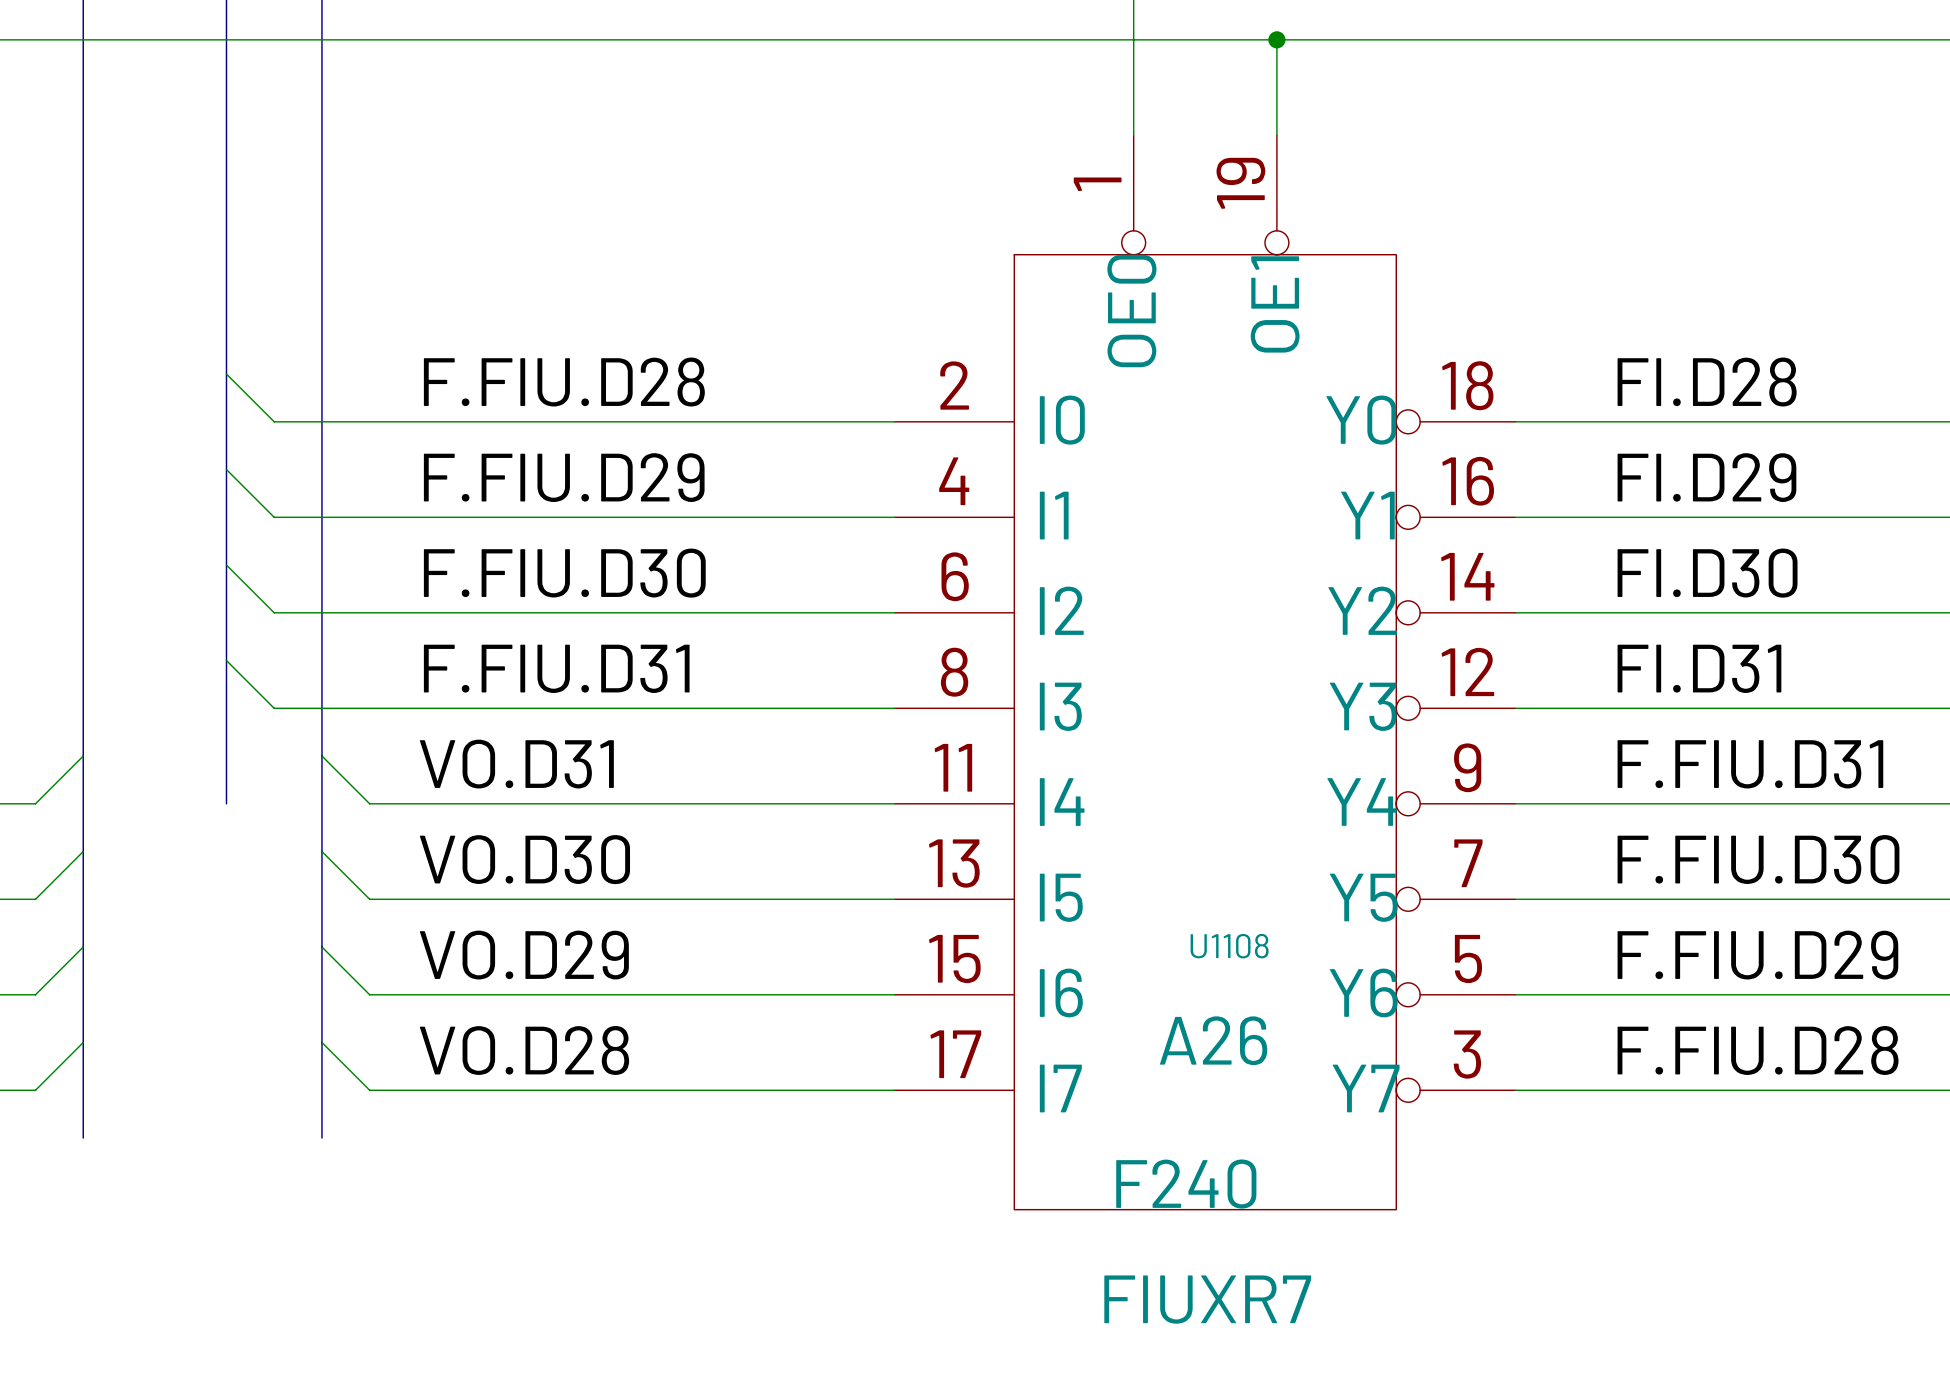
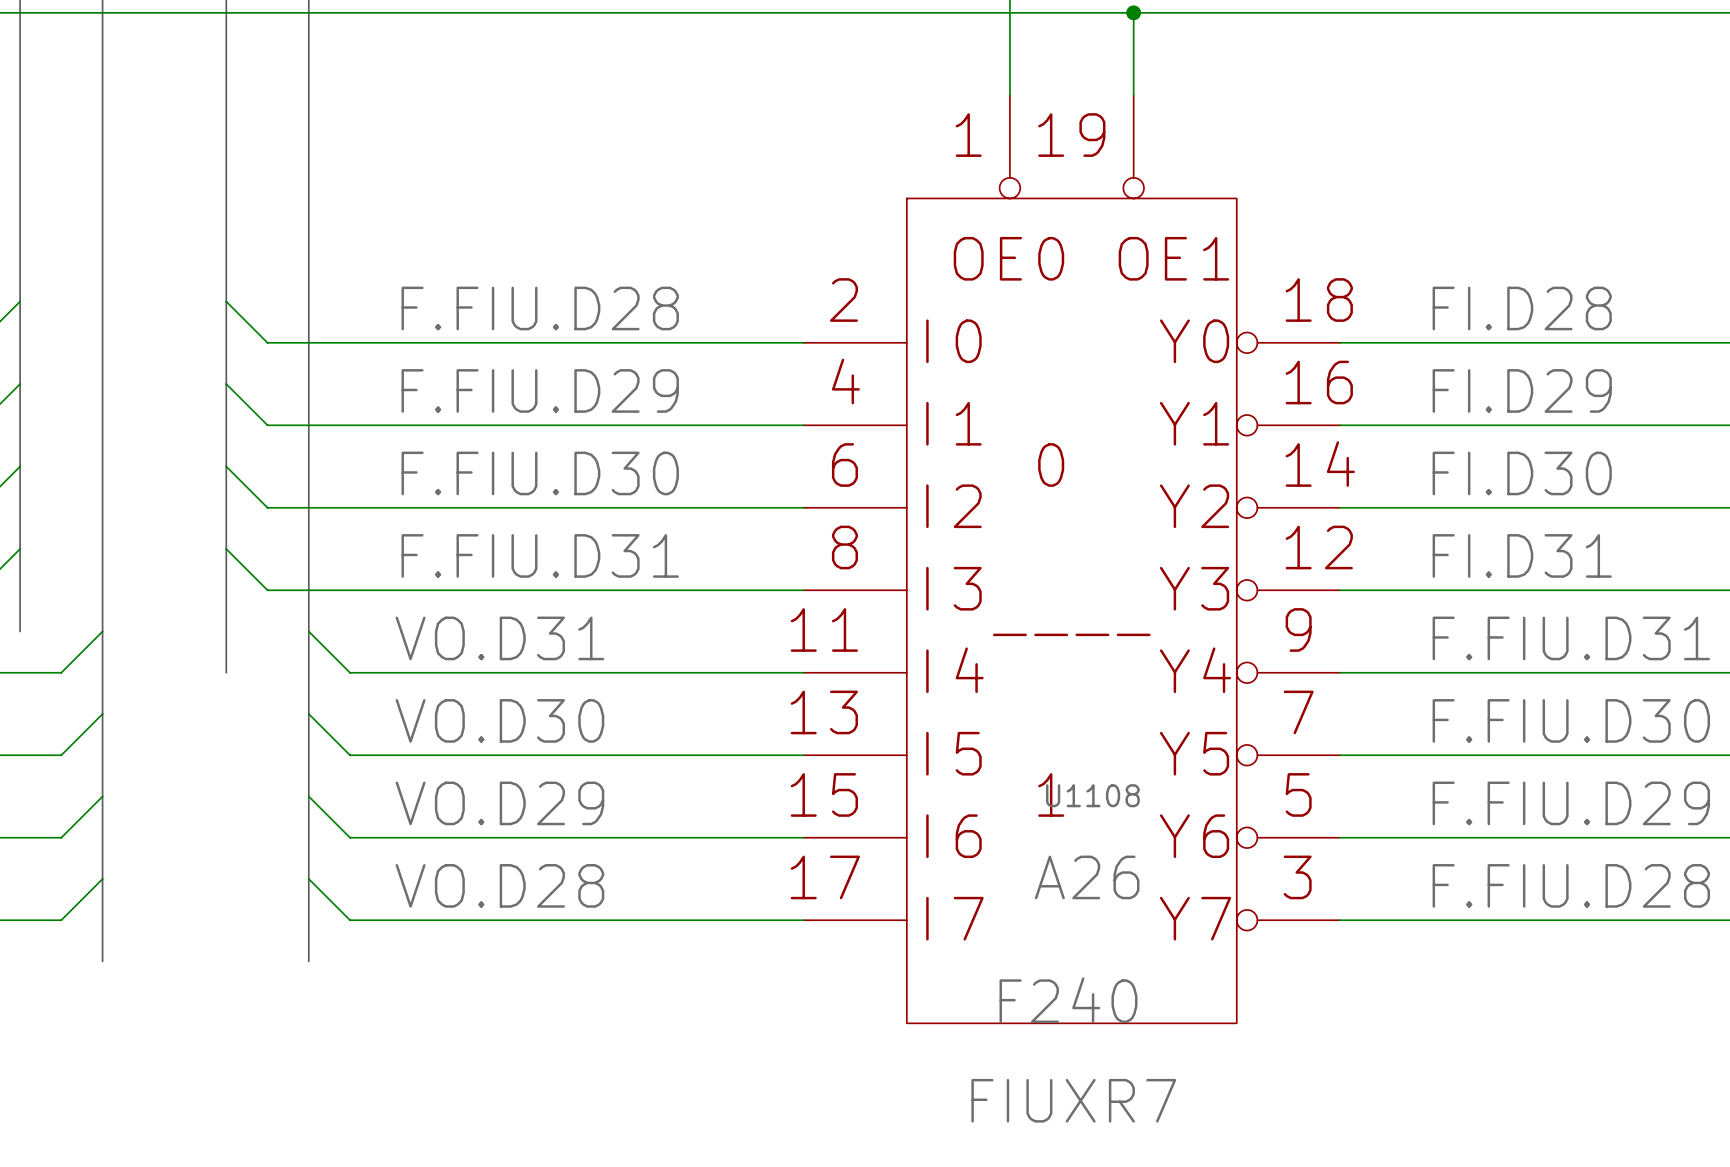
U1108 symbol: [894, 135, 1516, 1210] -> [803, 95, 1340, 1024]

